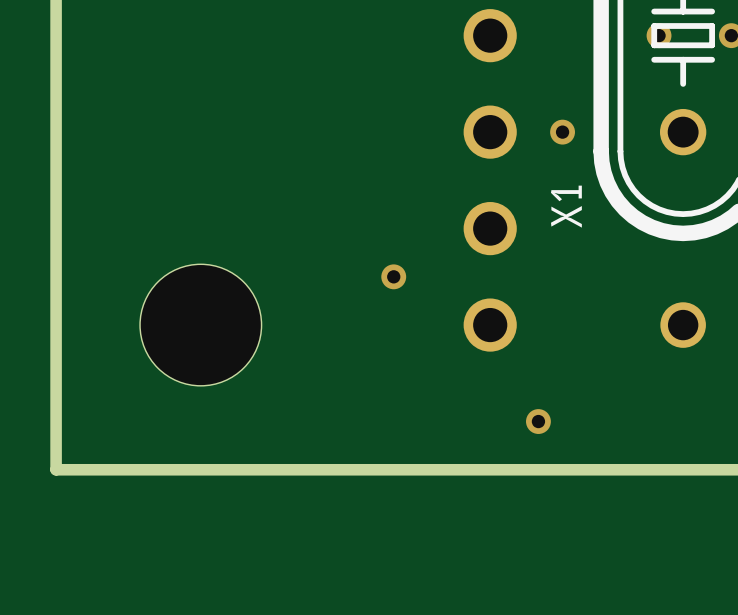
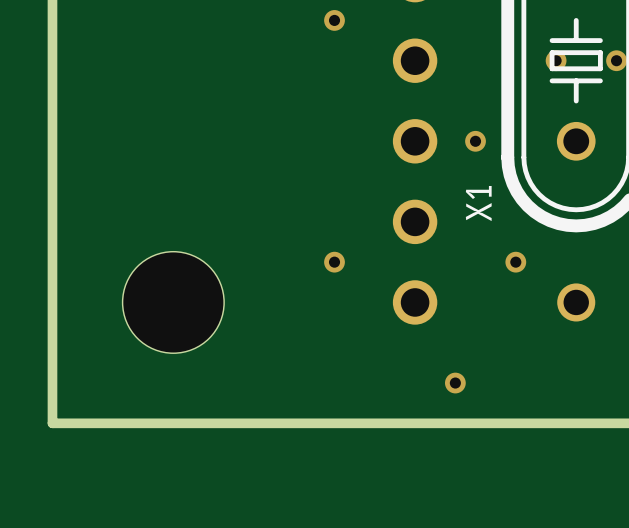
via: none -> (515, 262)

